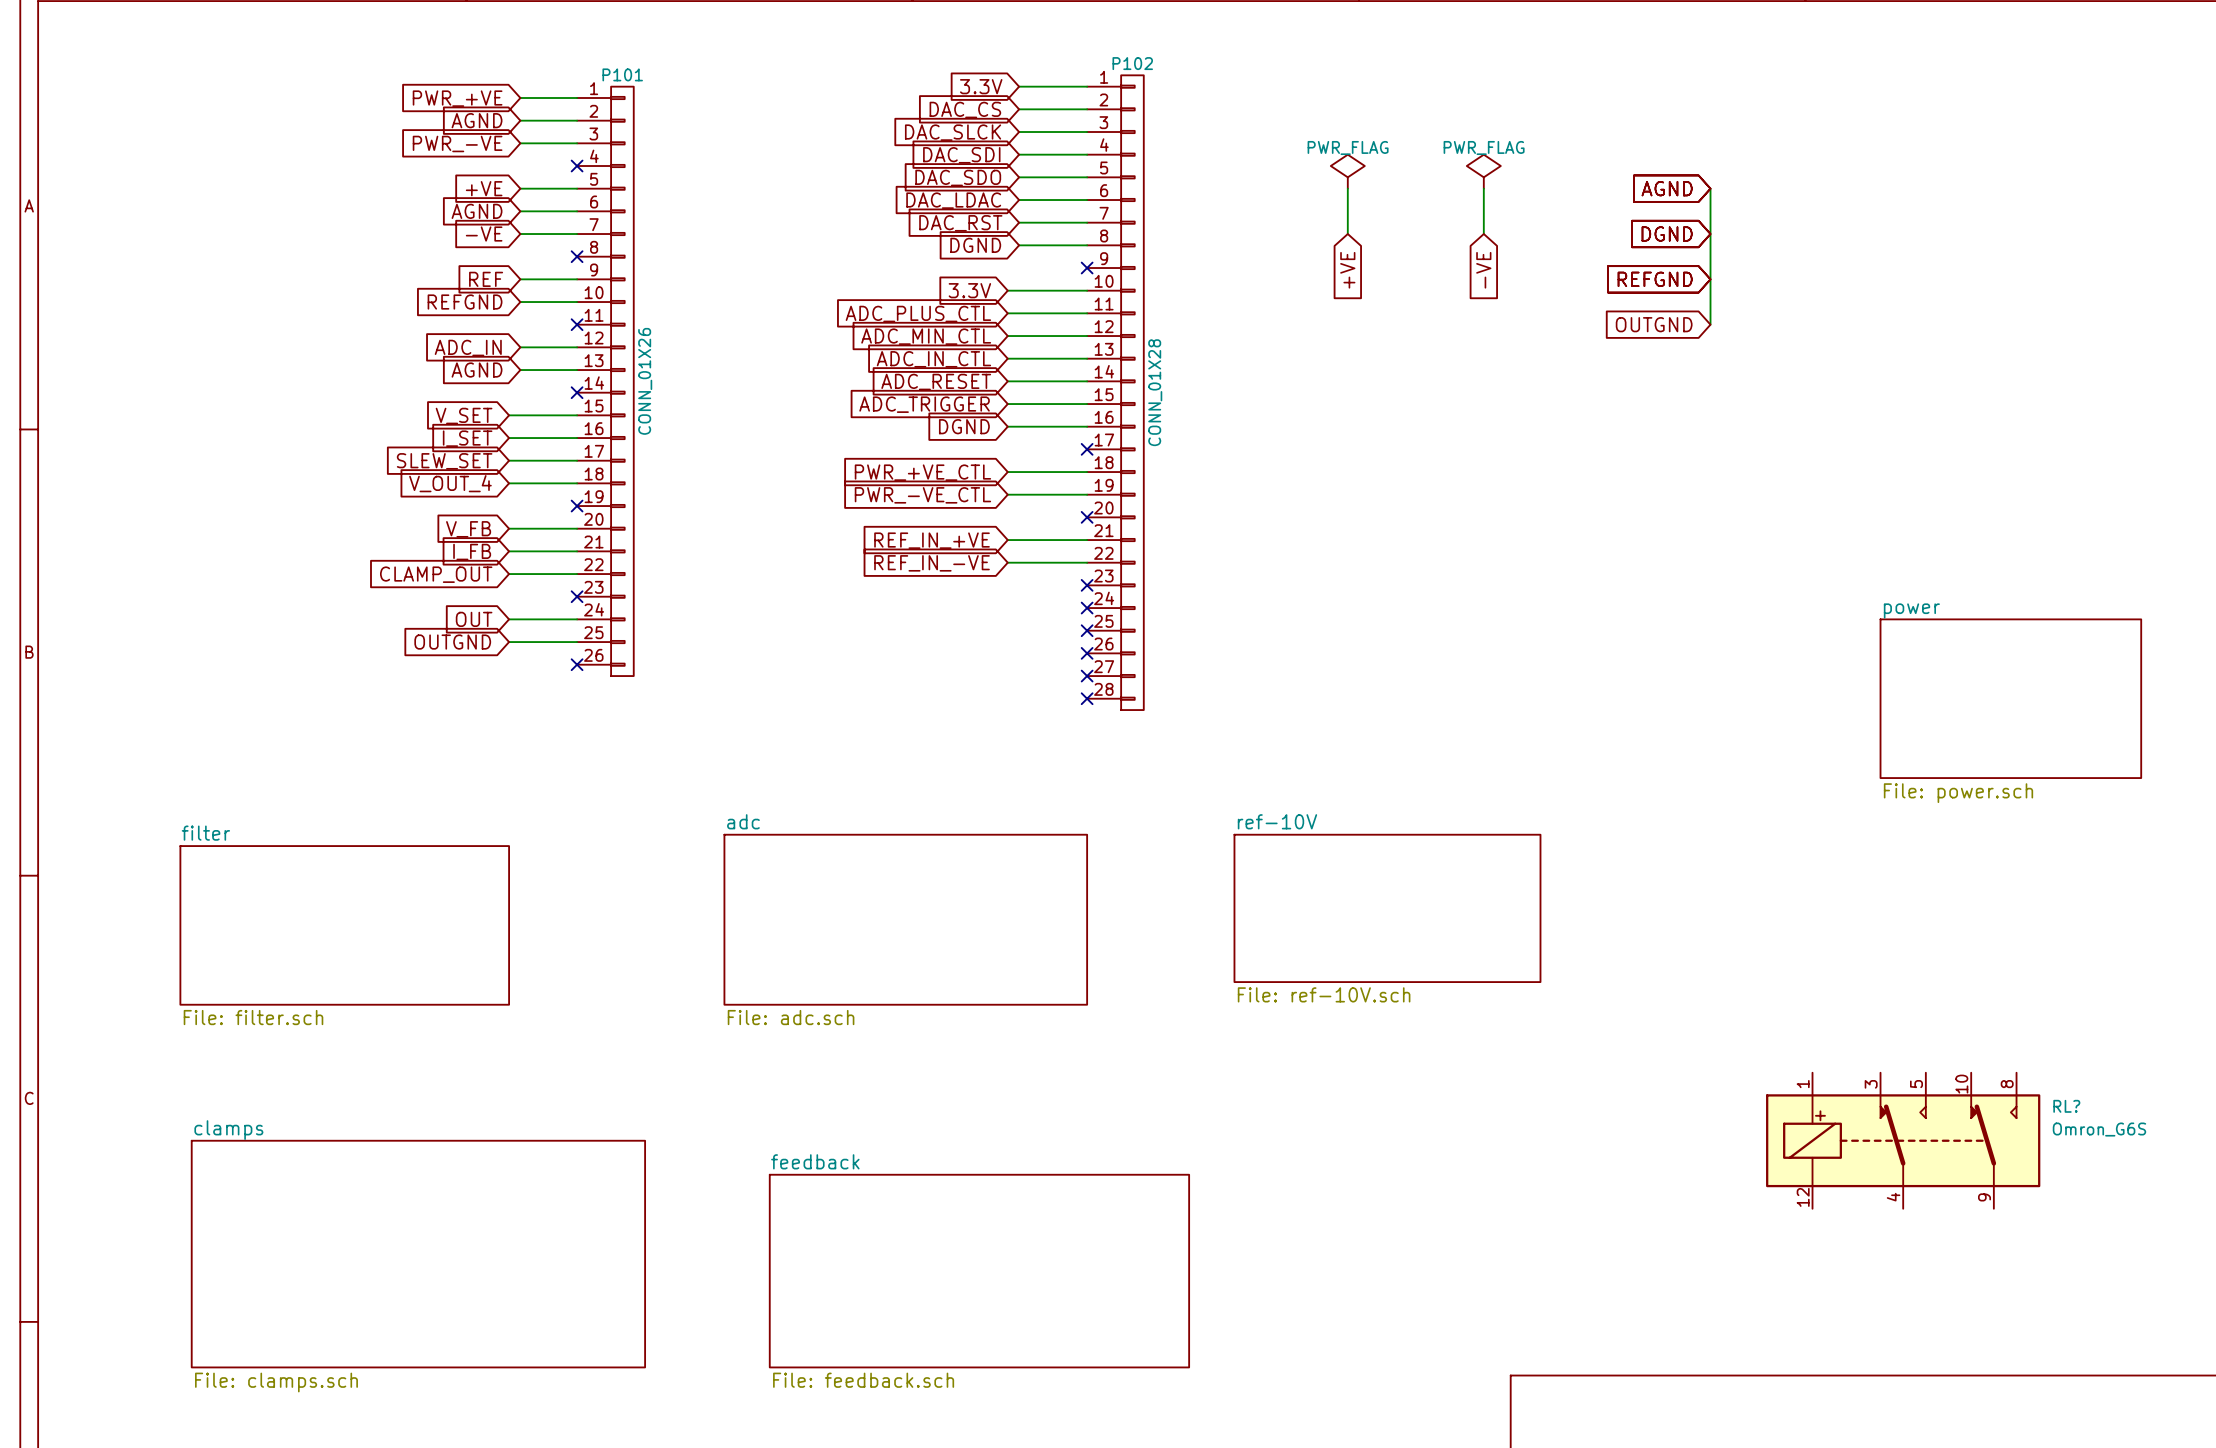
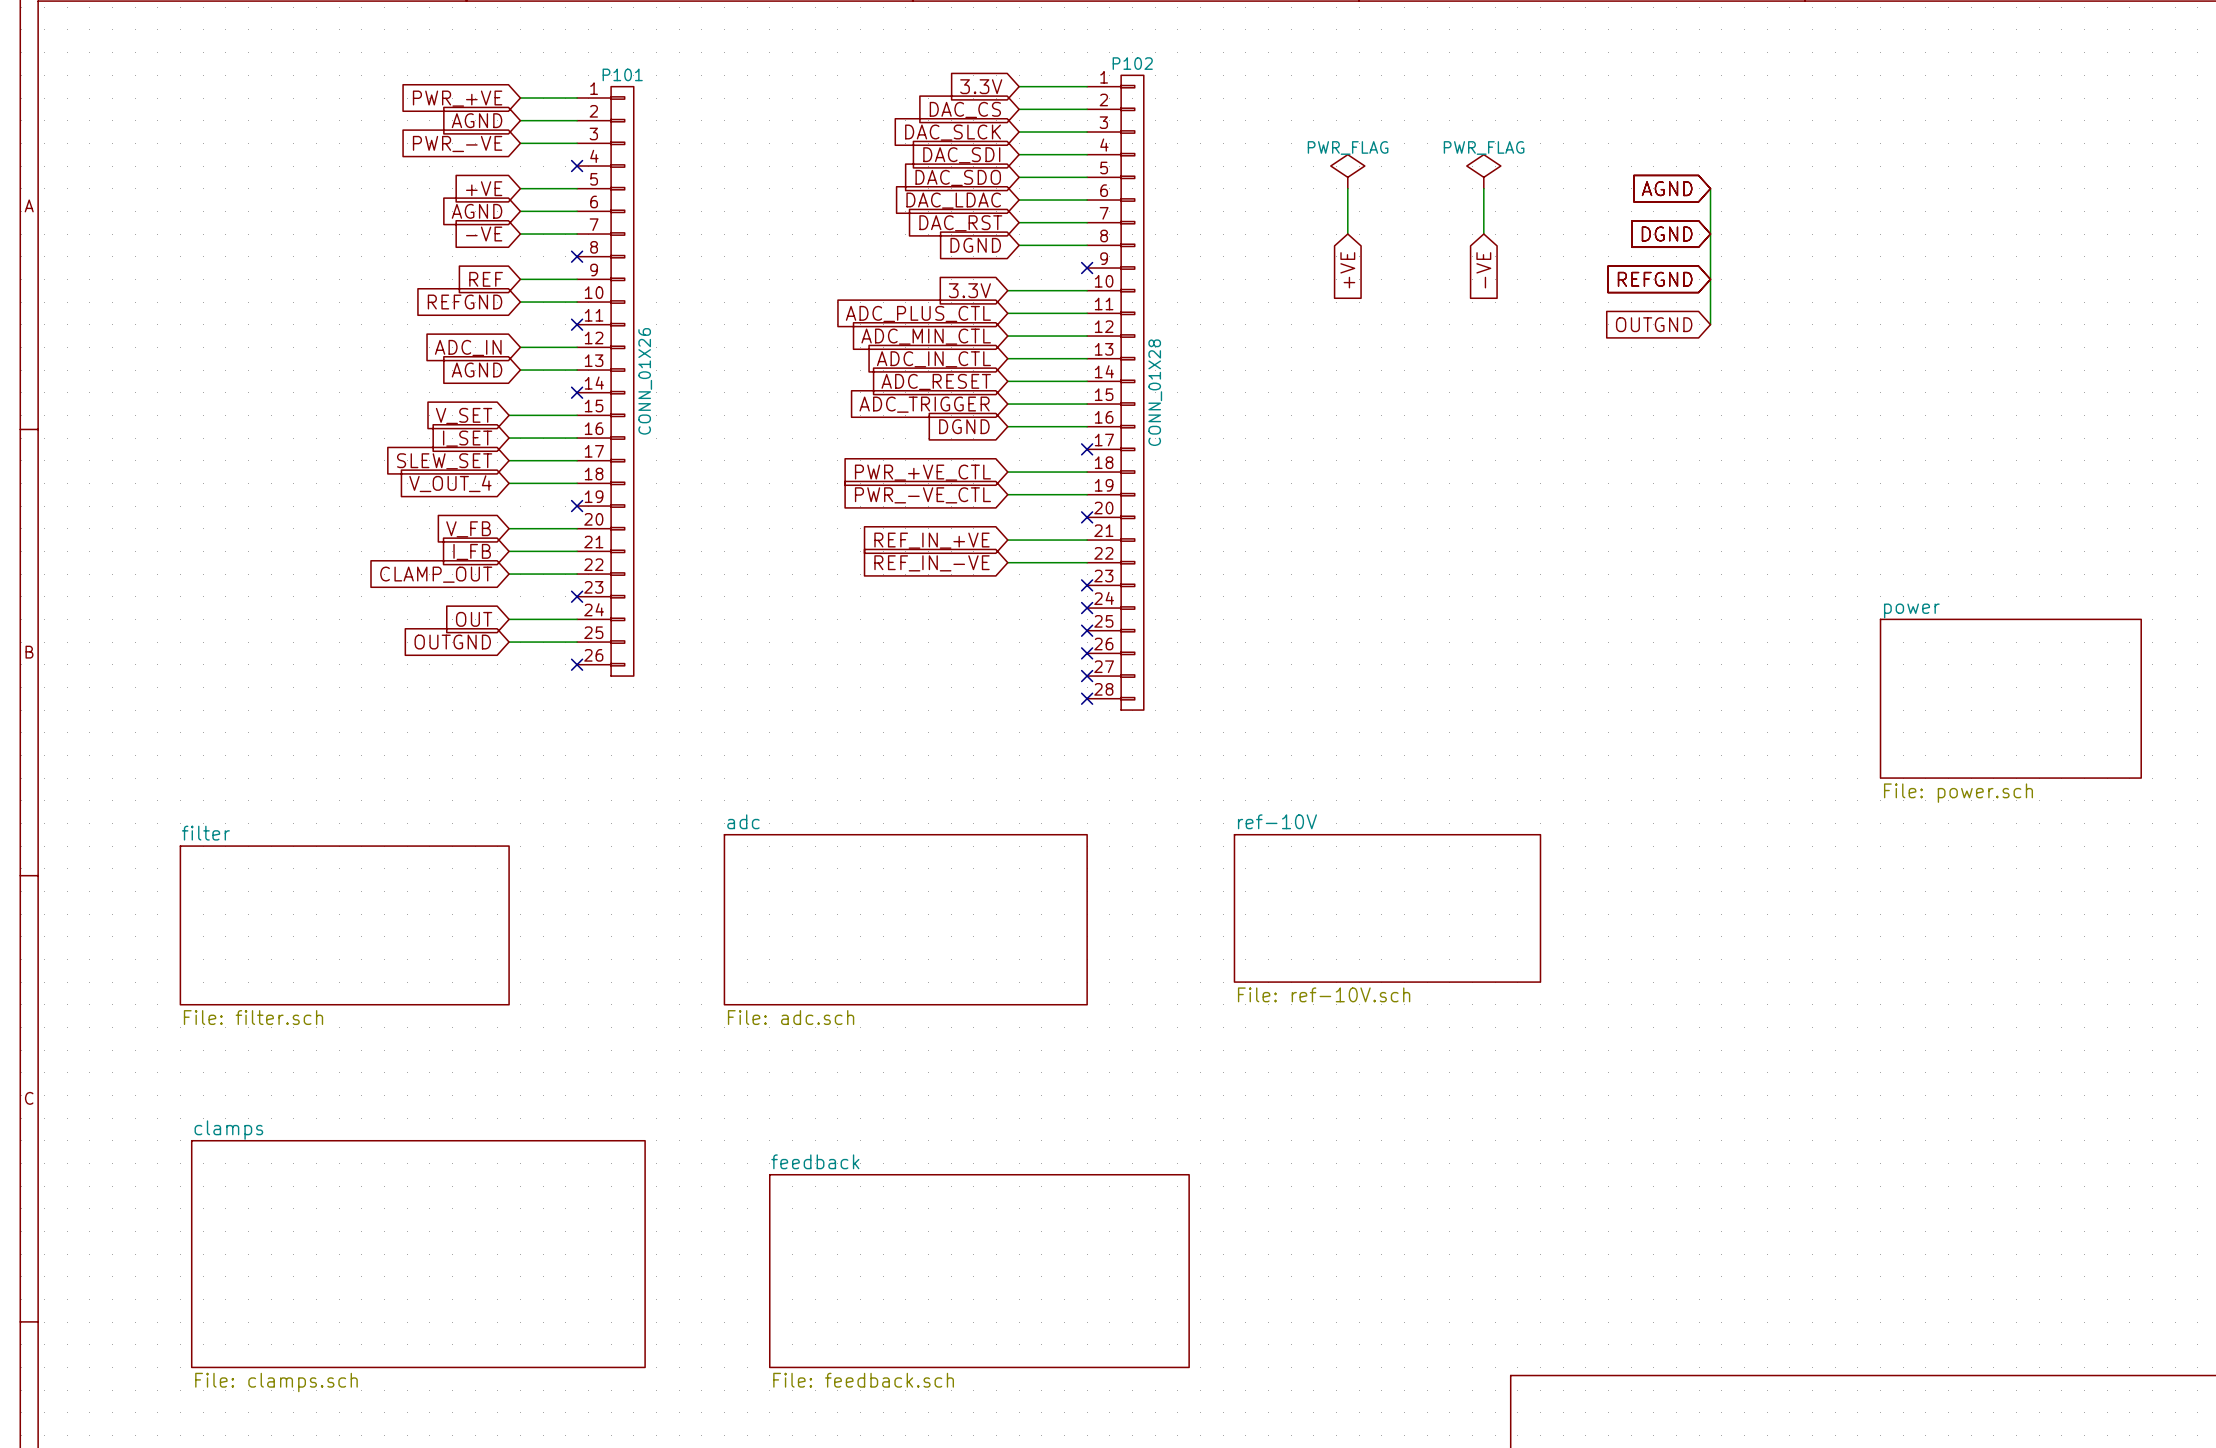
RL?: Omron_G6S (1903, 1140) -> none

